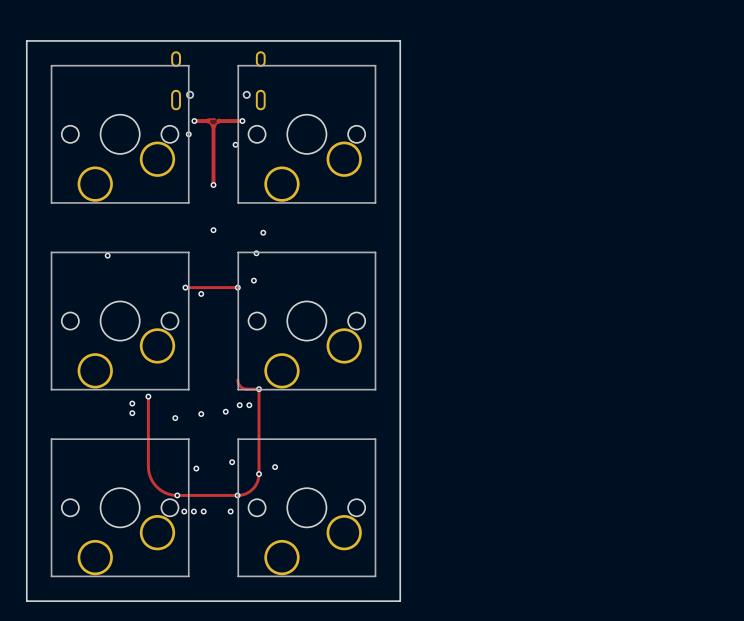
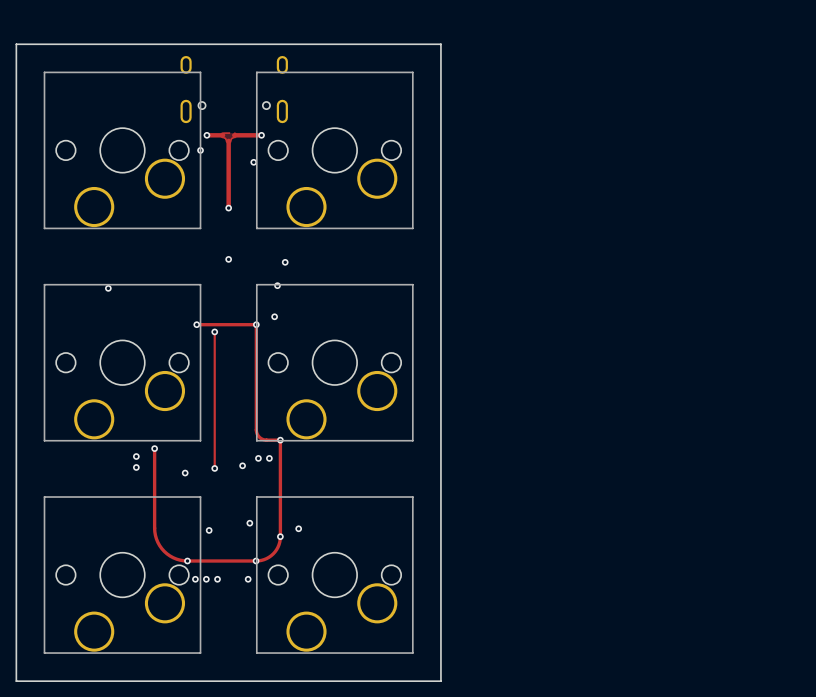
track: none -> (256, 324) (256, 429)
track: none -> (214, 331) (214, 468)

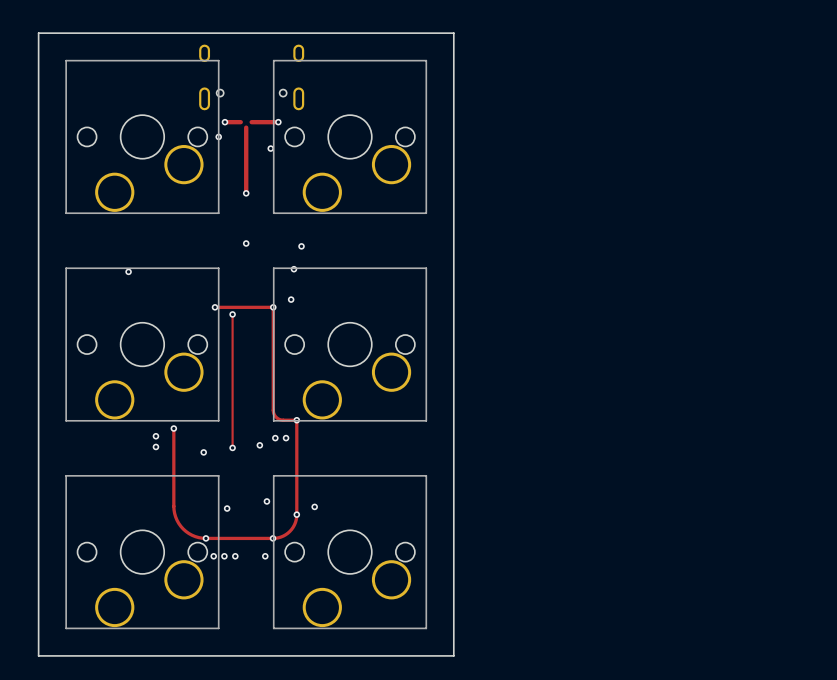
zone outline: (223, 133) (234, 133) -> none
zone outline: (222, 137) (228, 143) (234, 137) -> none

